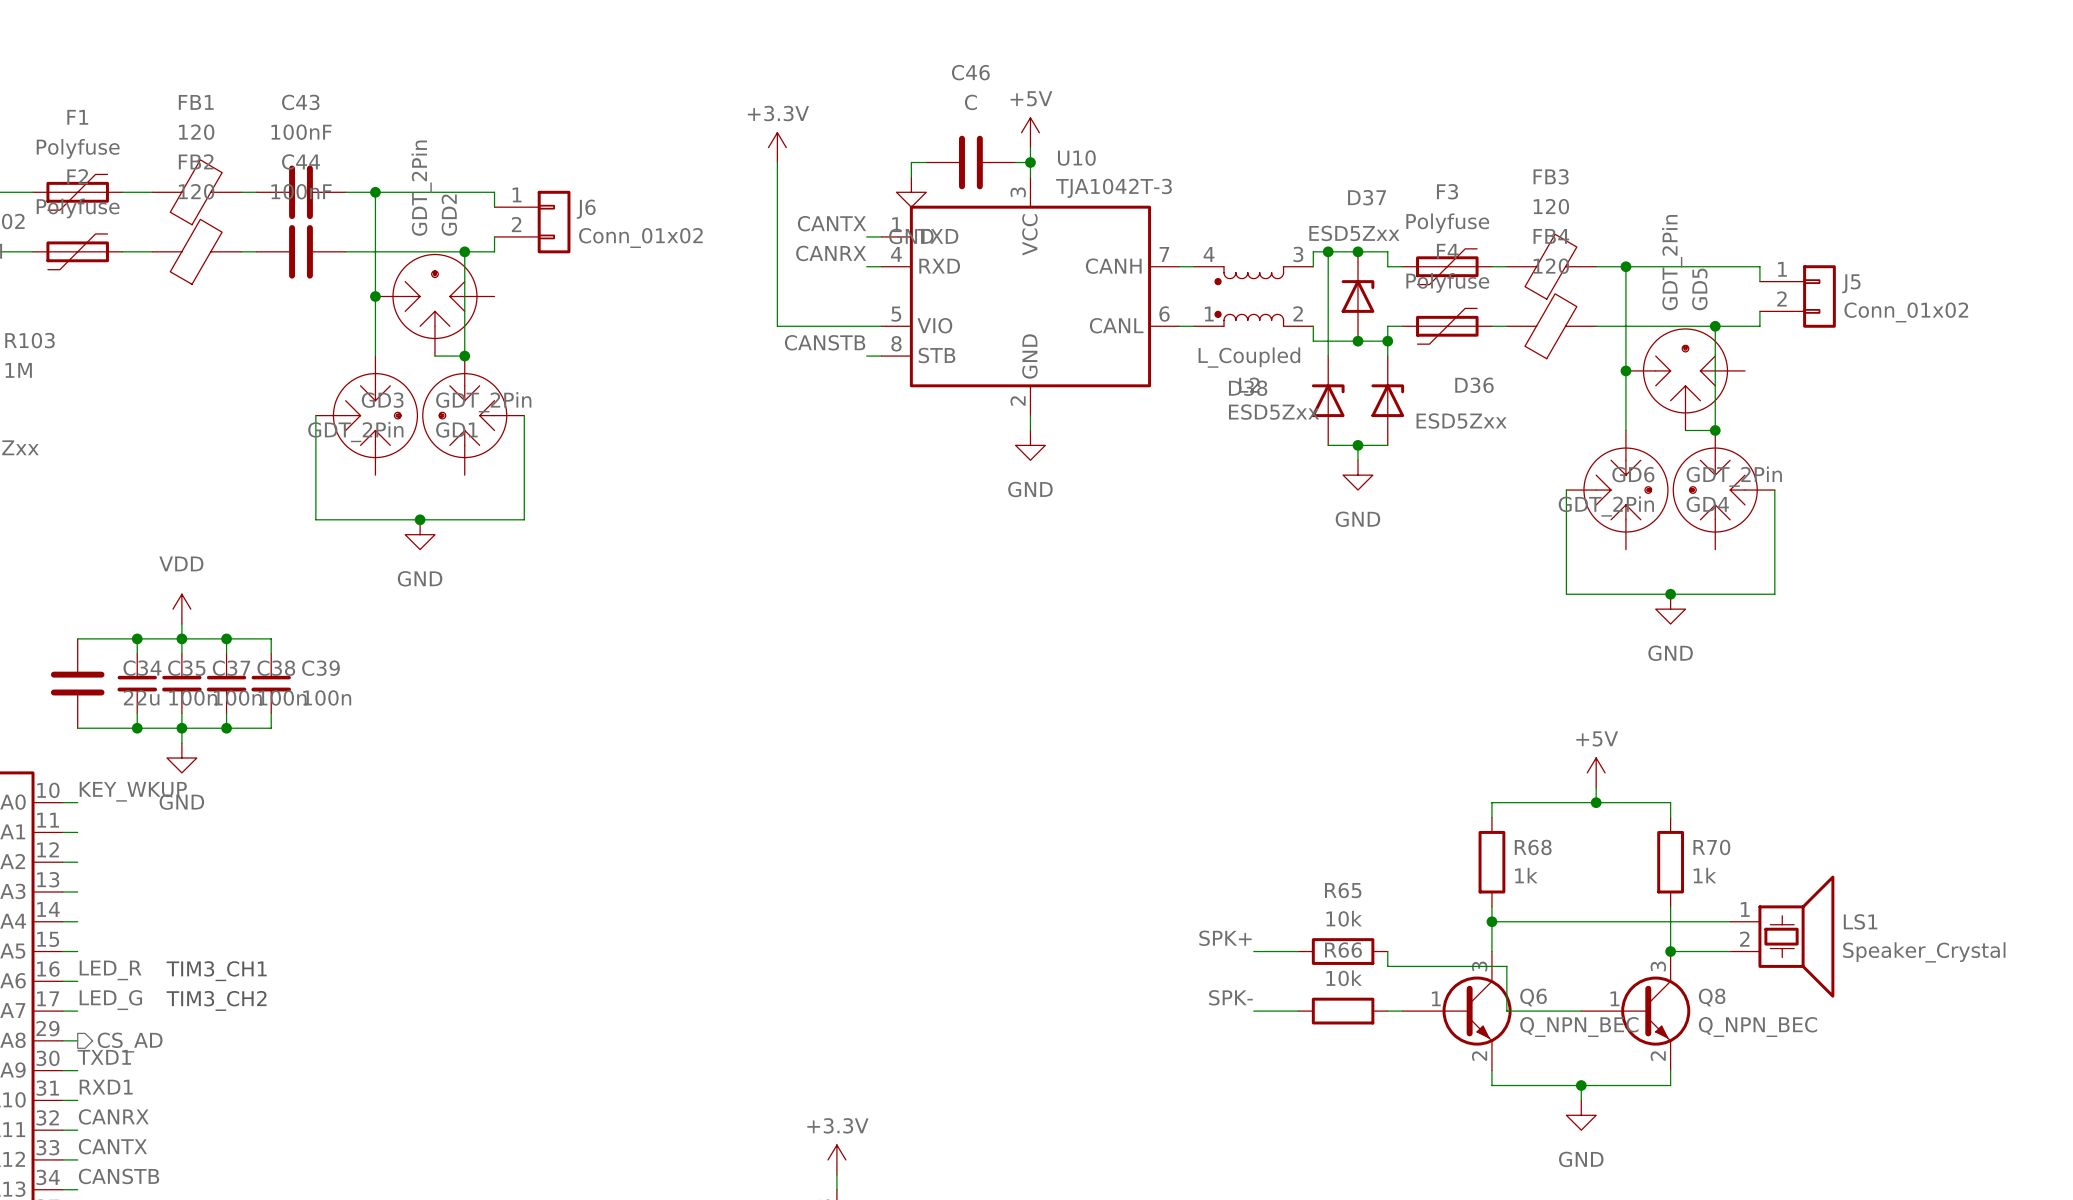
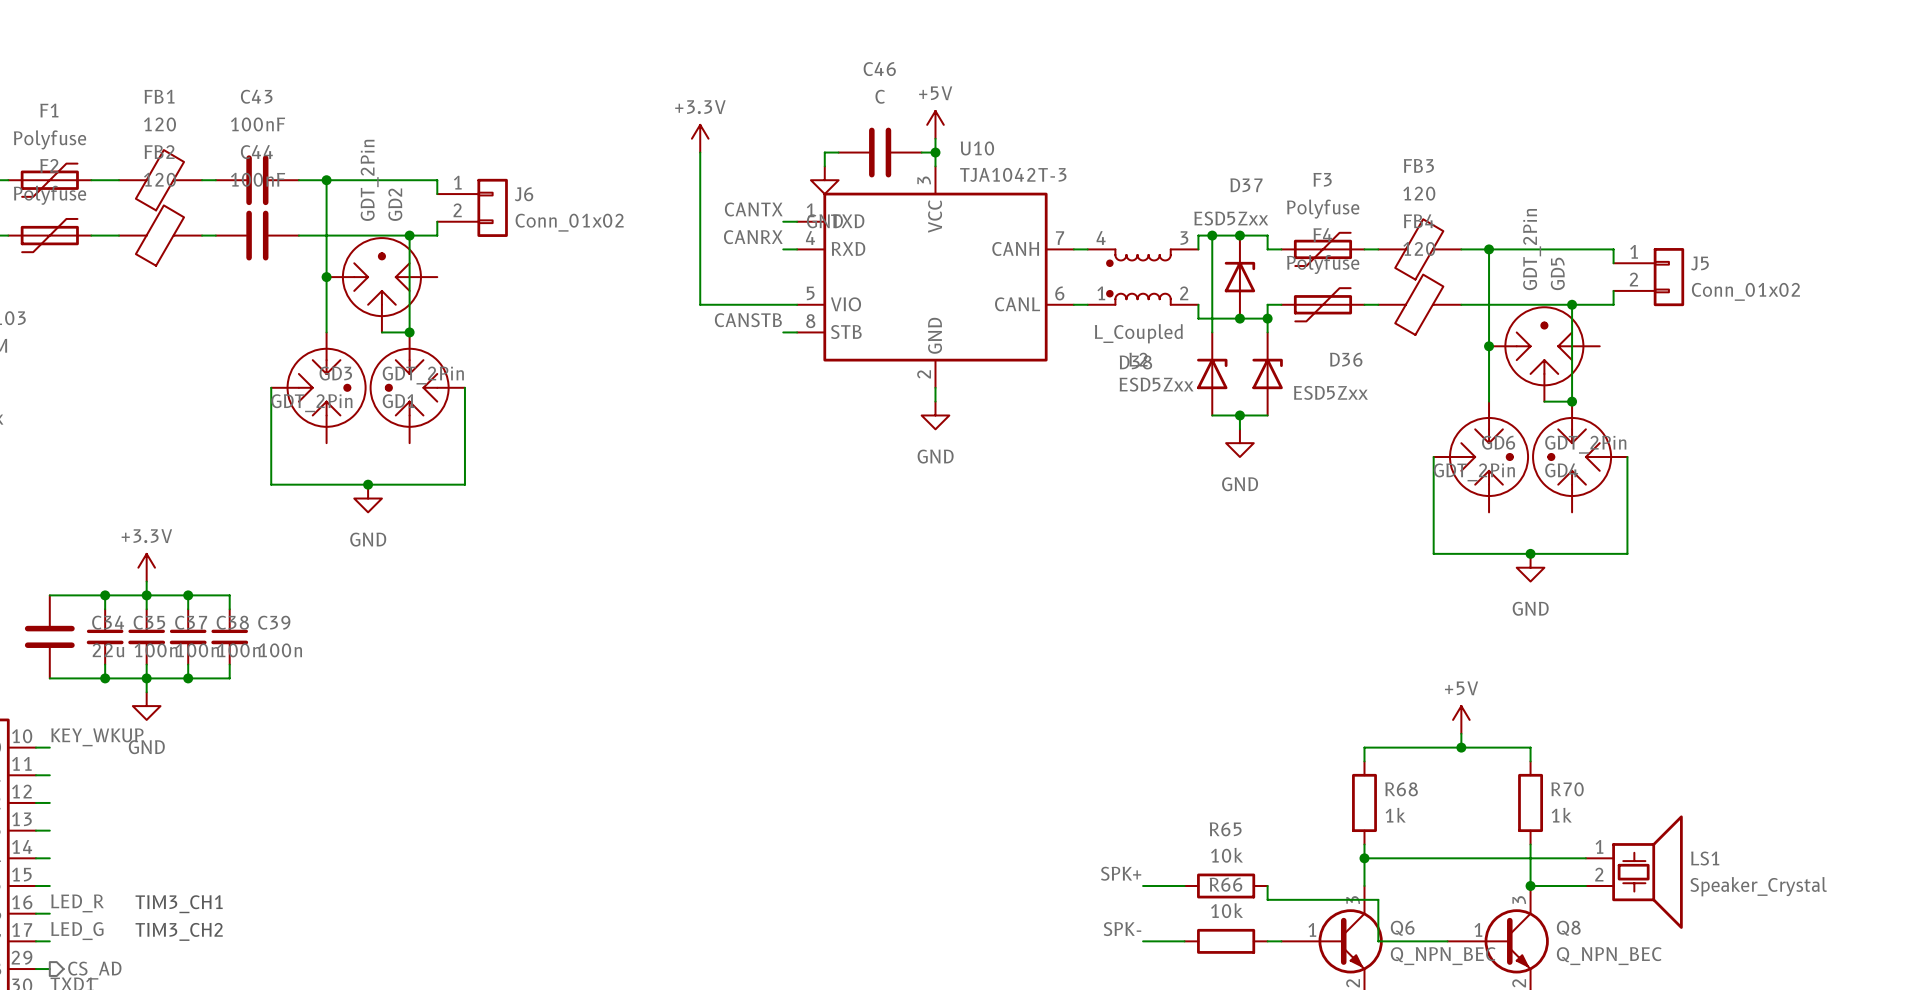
power symbol: VDD (181, 609) -> +3.3V (146, 567)

